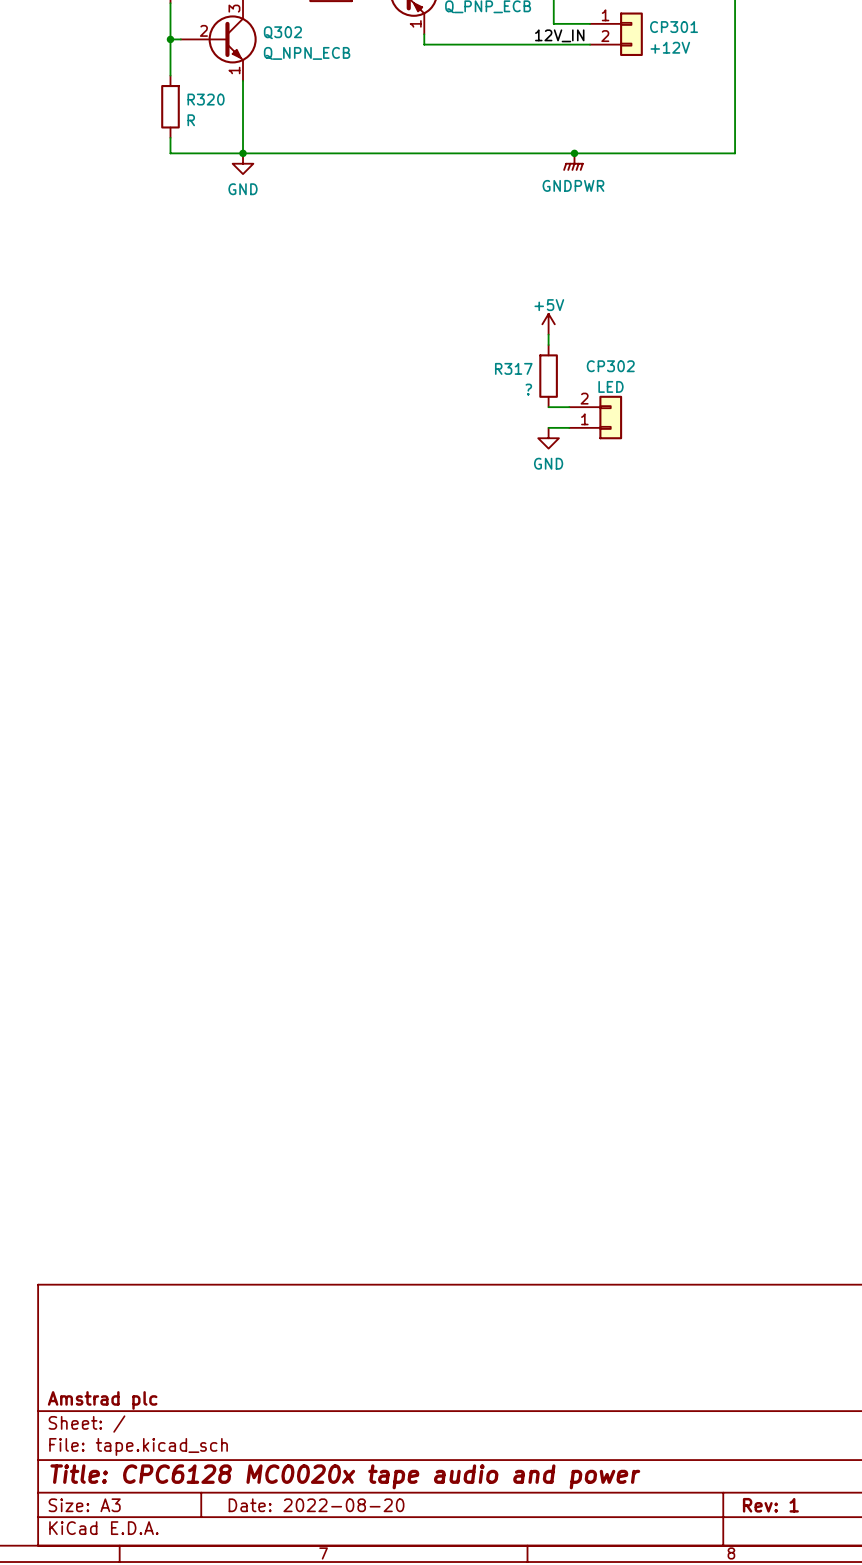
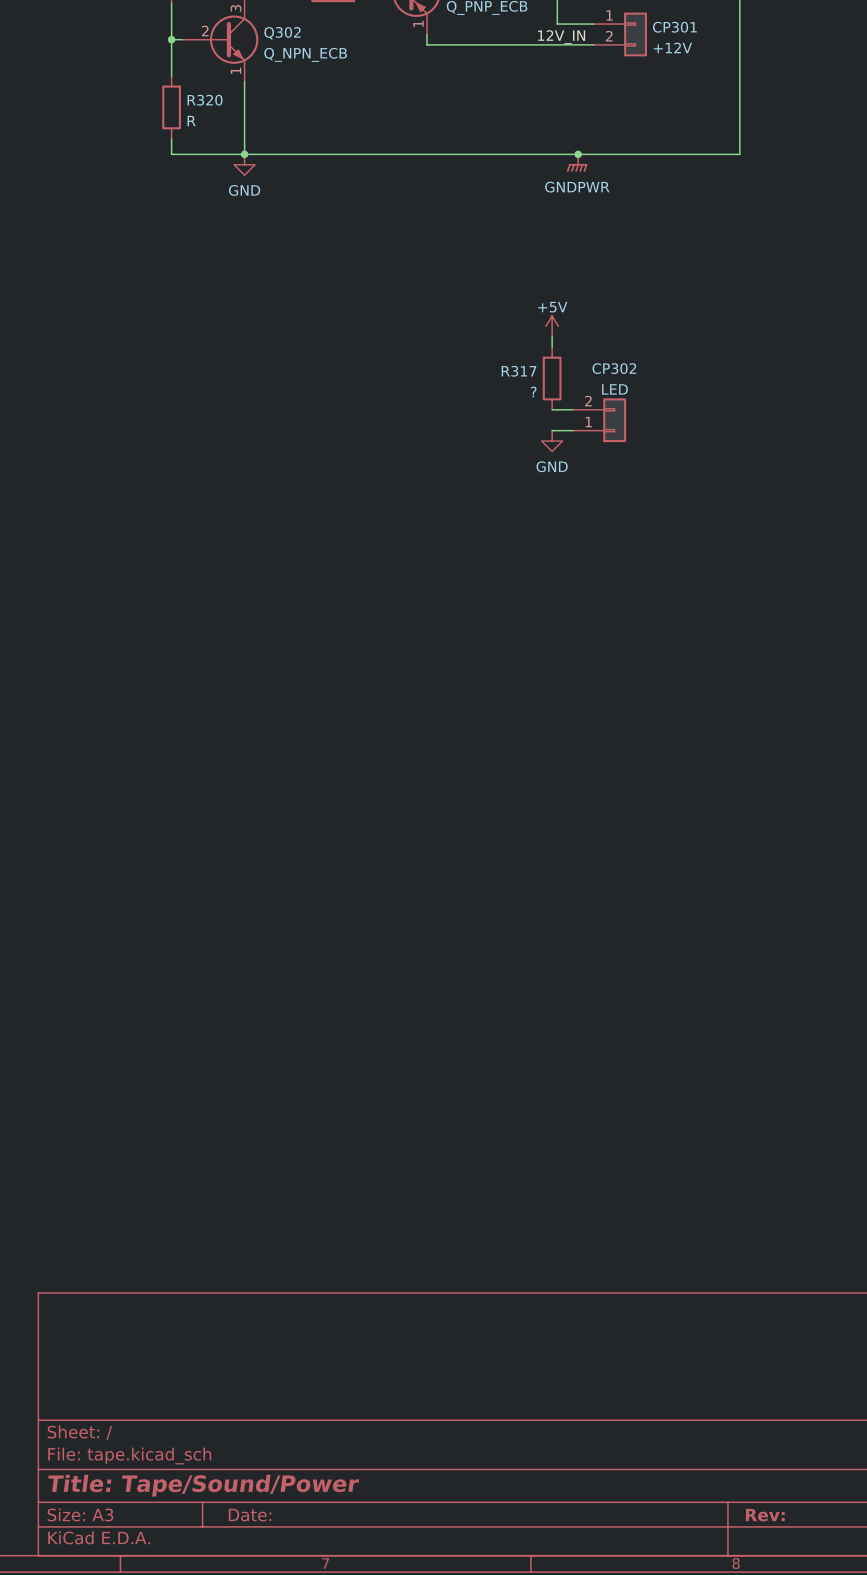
title block: Amstrad plc (102, 1400) -> none
title block: Title: CPC6128 MC0020x tape audio and power (345, 1476) -> Title: Tape/Sound/Power (203, 1485)
title block: Date: 2022-08-20 (316, 1505) -> Date: (250, 1515)
title block: Rev: 1 (770, 1505) -> Rev: (765, 1515)

